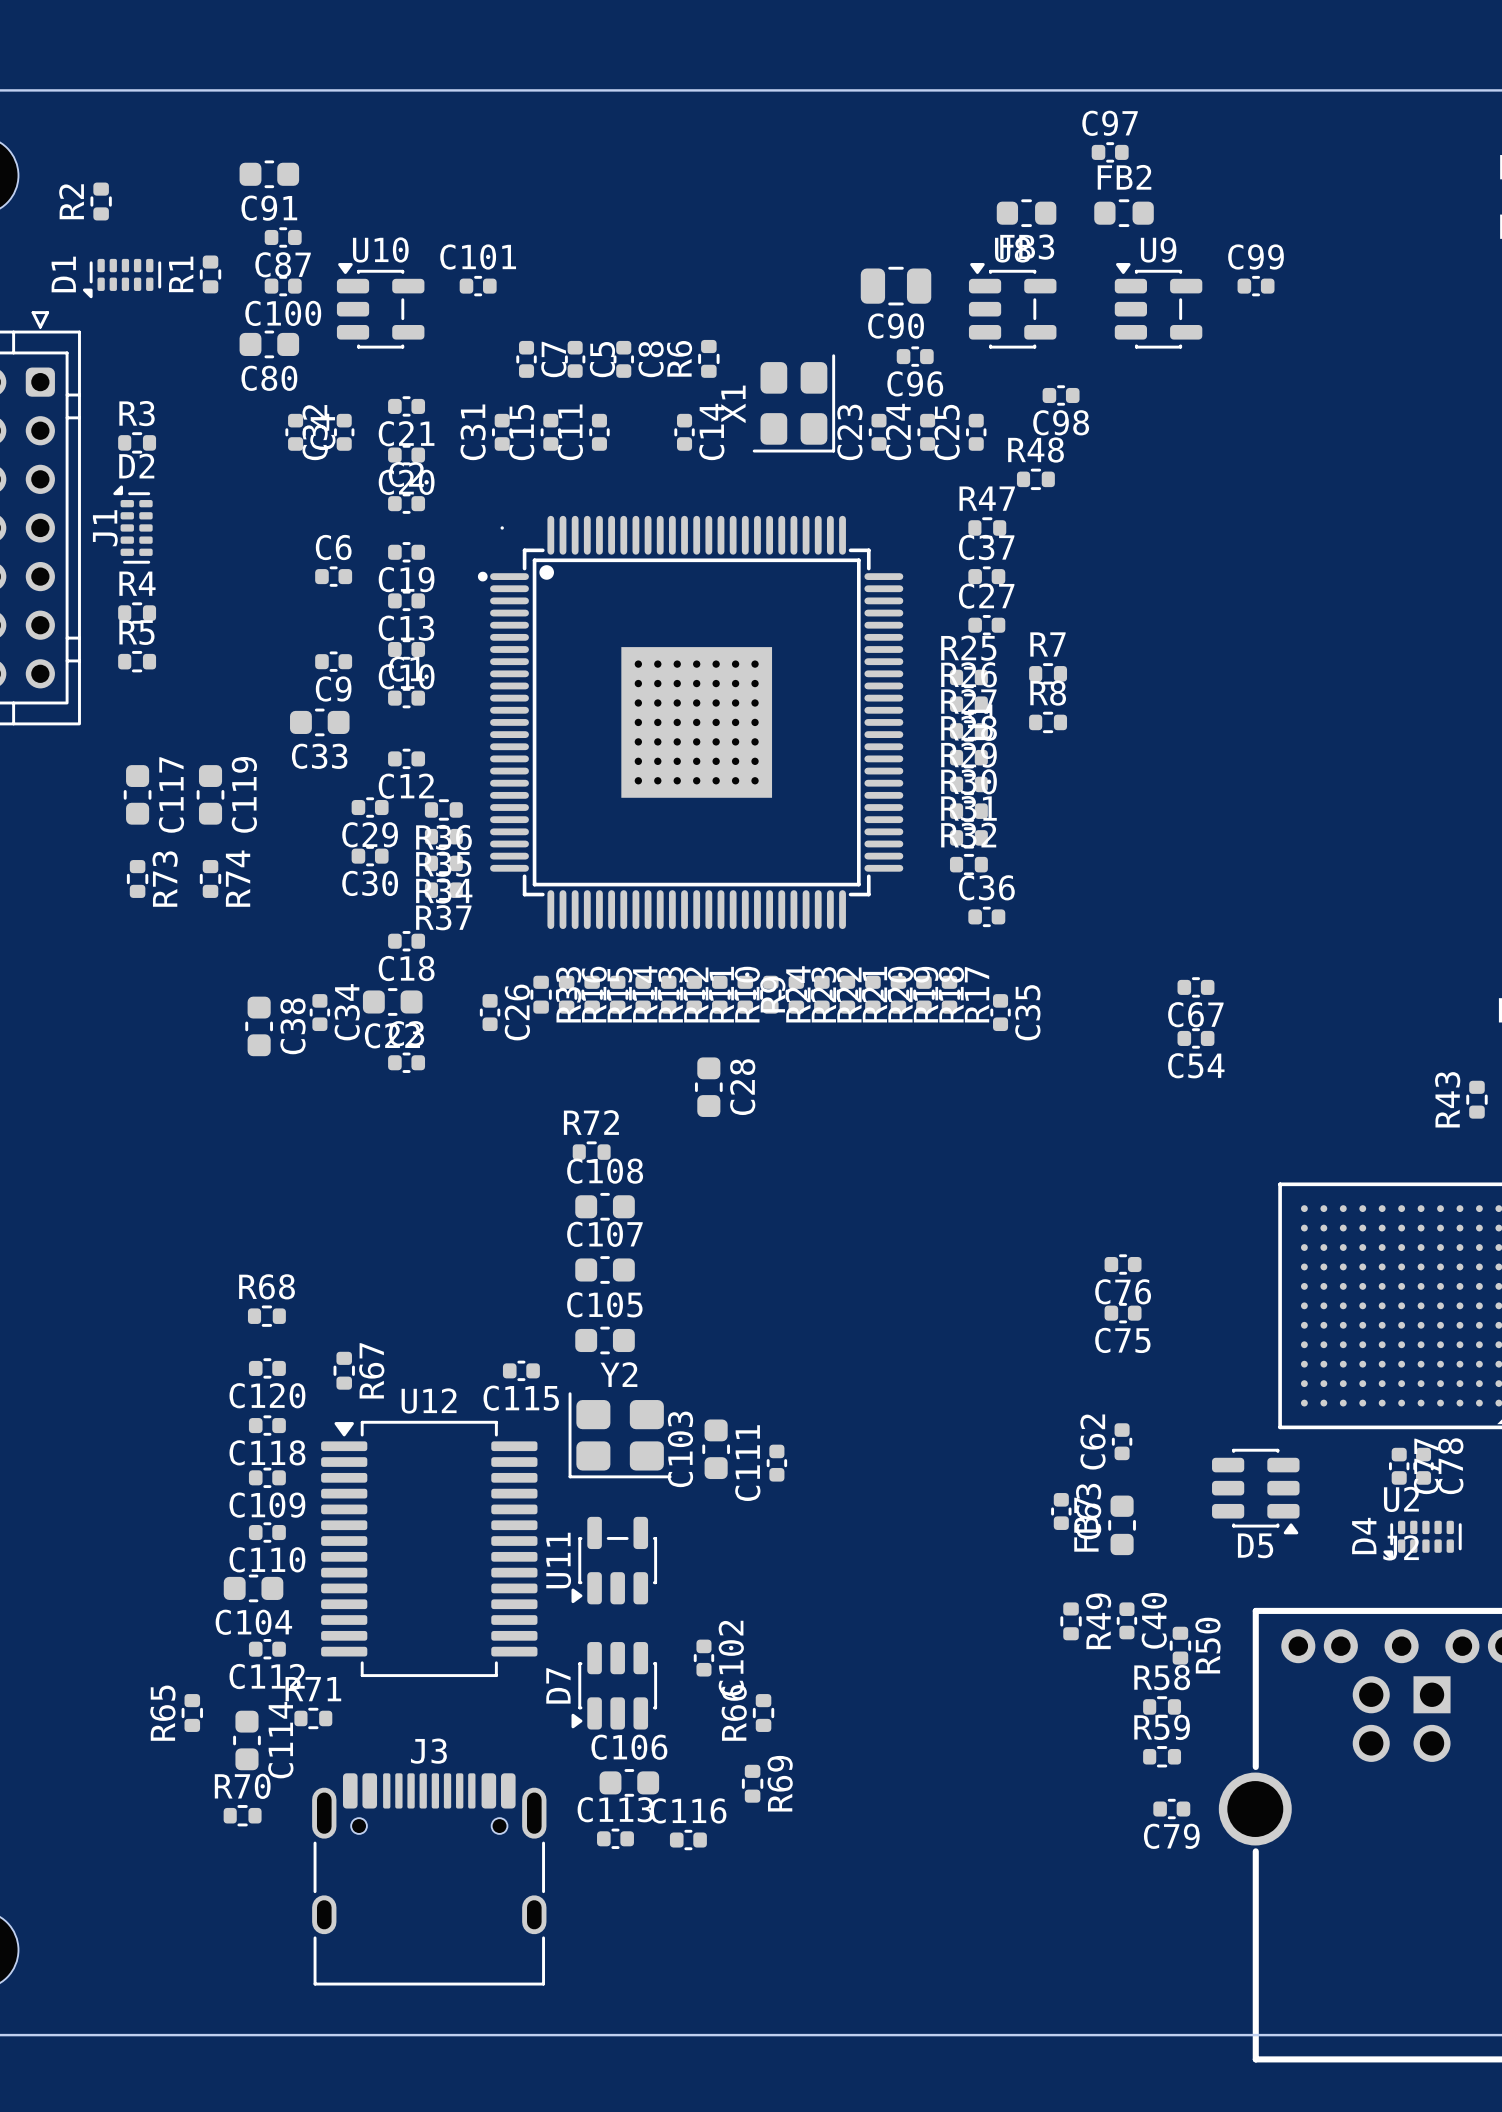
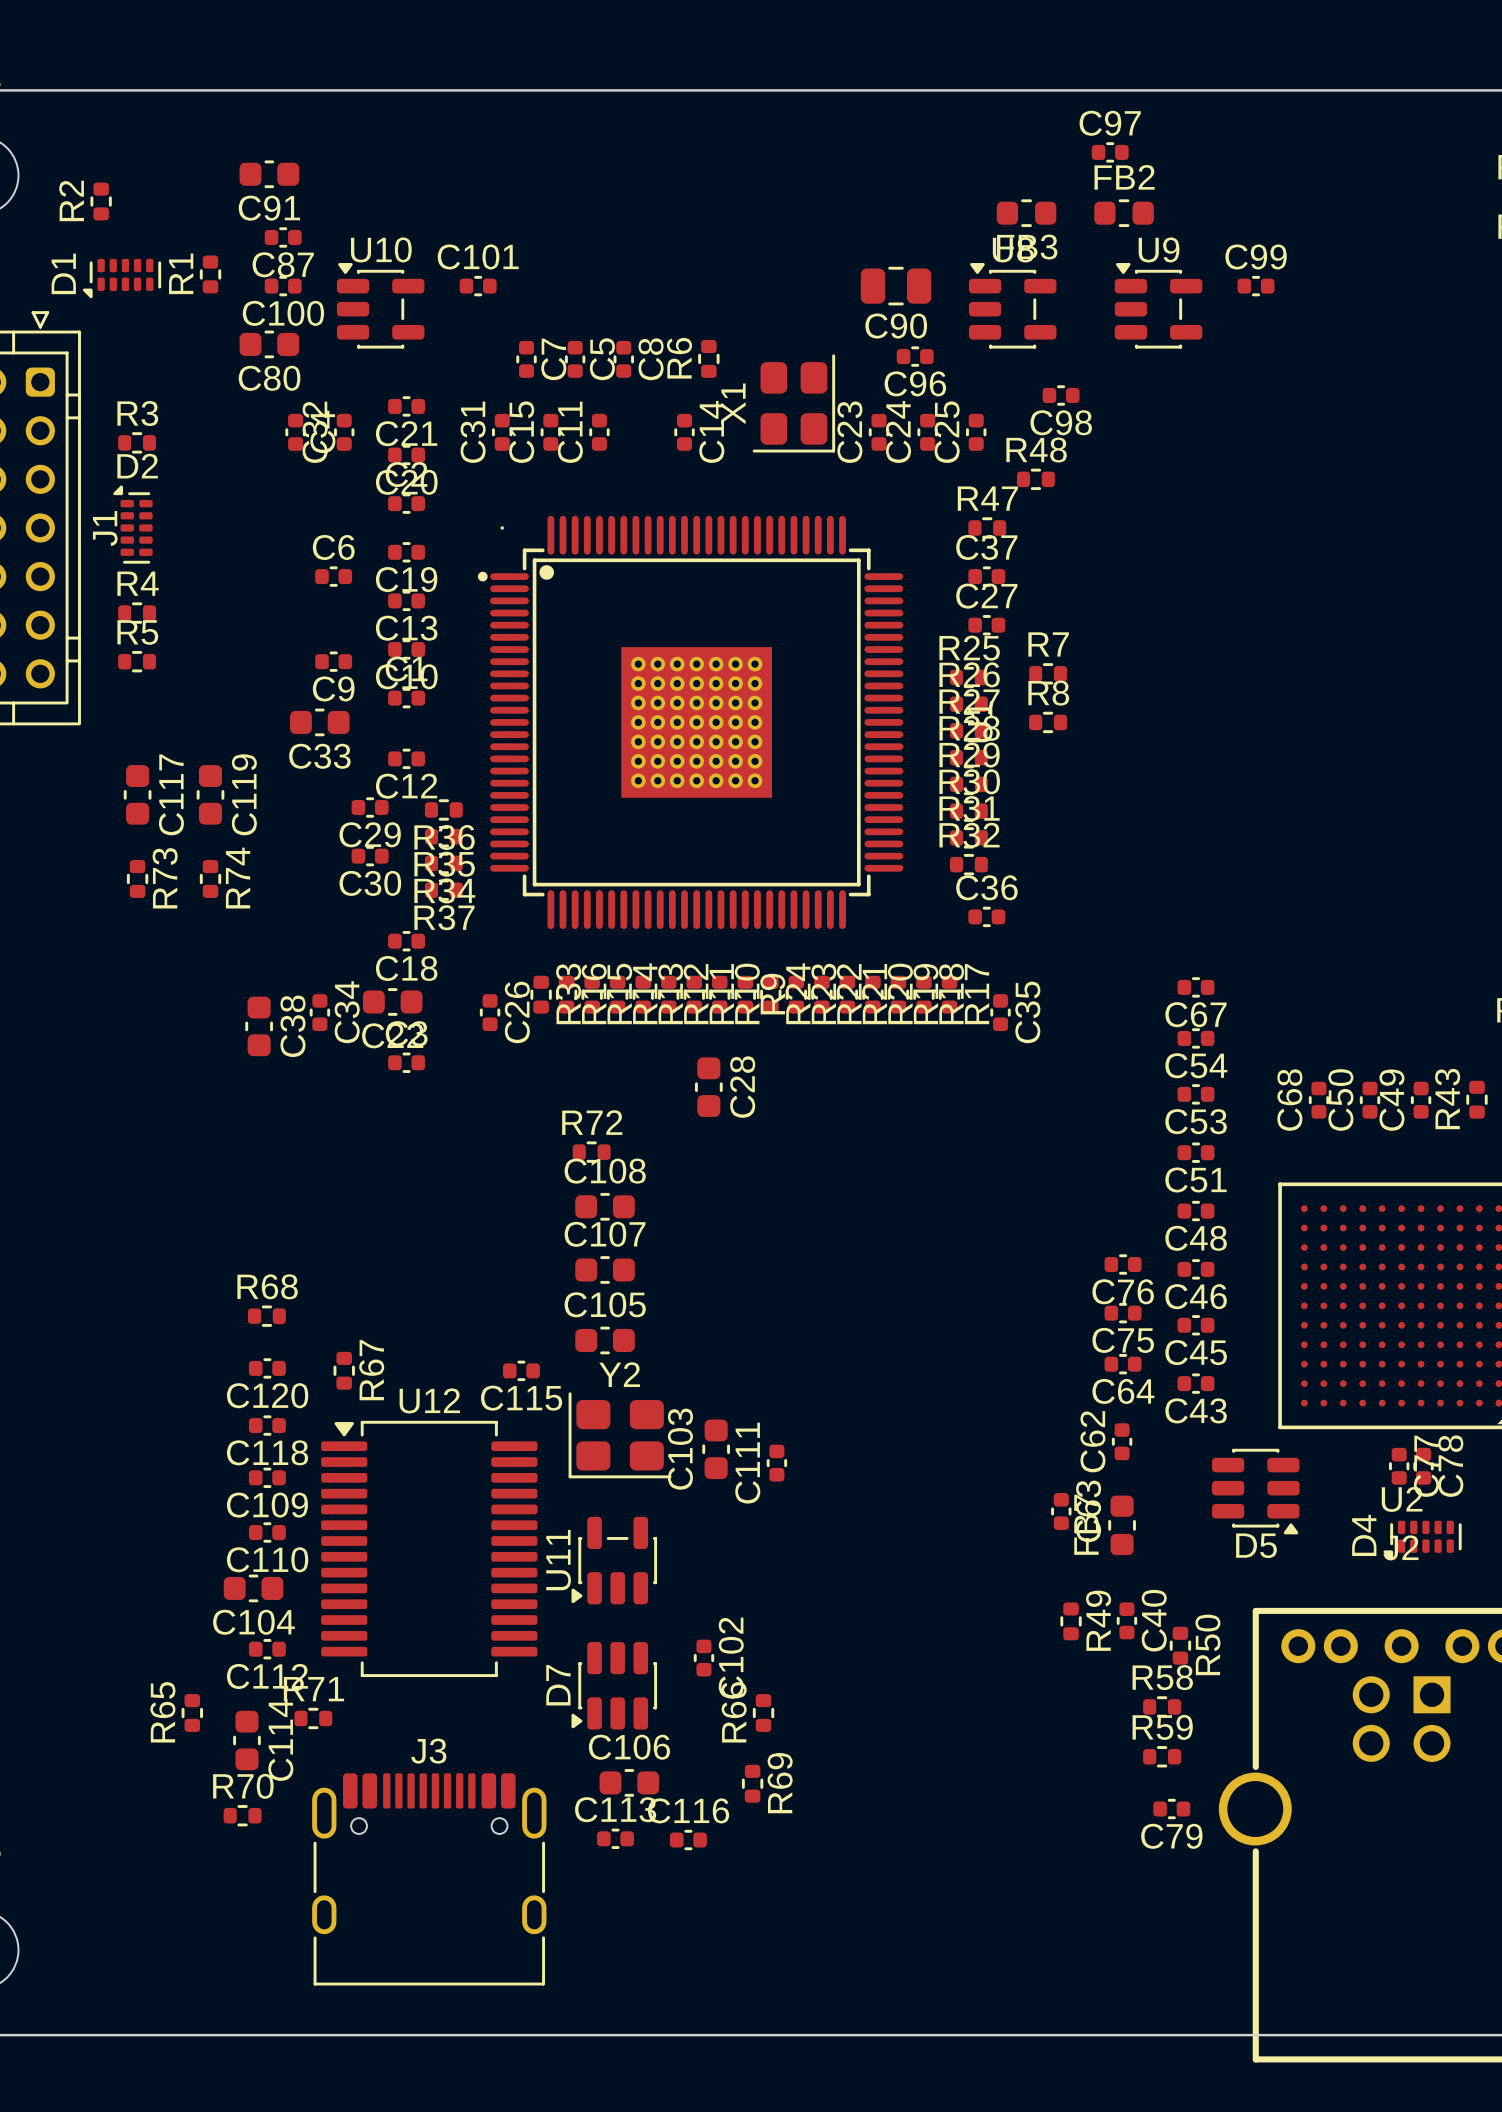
C53: none -> (1195, 1094)
C68: none -> (1318, 1100)
C50: none -> (1370, 1100)
C49: none -> (1421, 1100)
C51: none -> (1195, 1152)
C48: none -> (1195, 1211)
C46: none -> (1195, 1269)
C45: none -> (1195, 1325)
C64: none -> (1123, 1364)
C43: none -> (1195, 1383)

